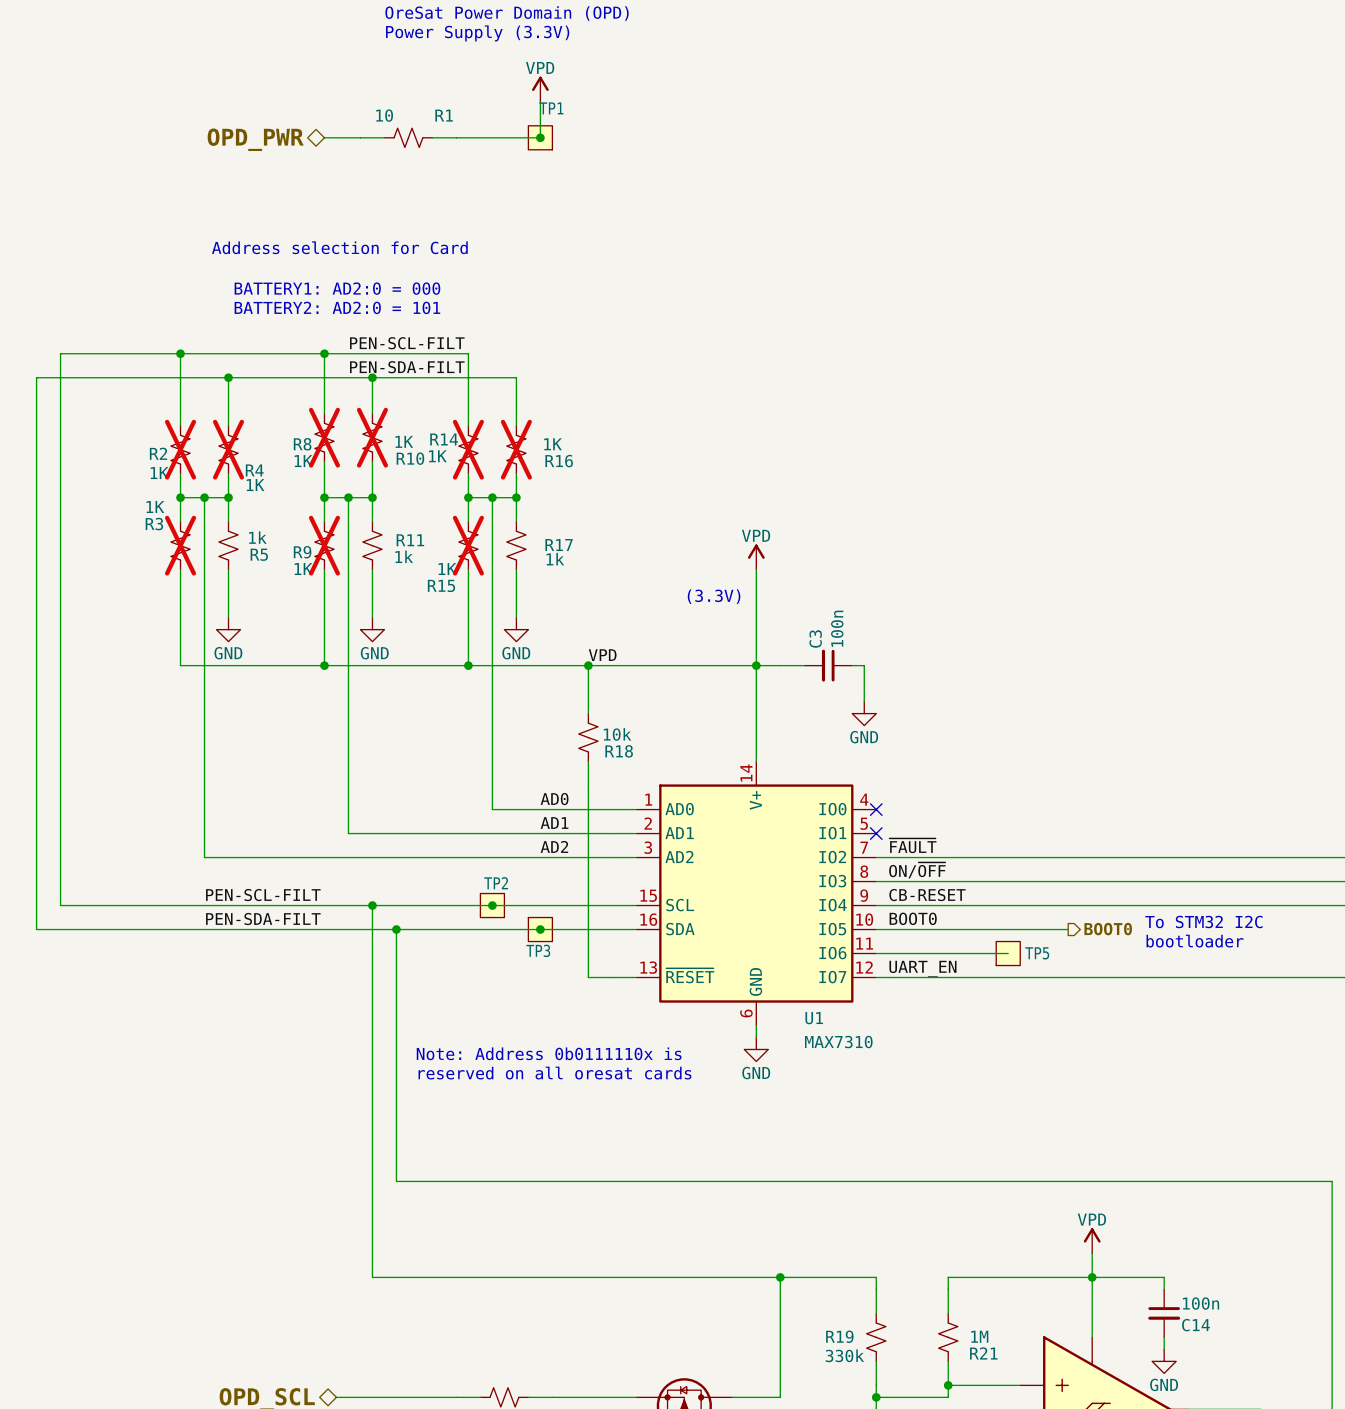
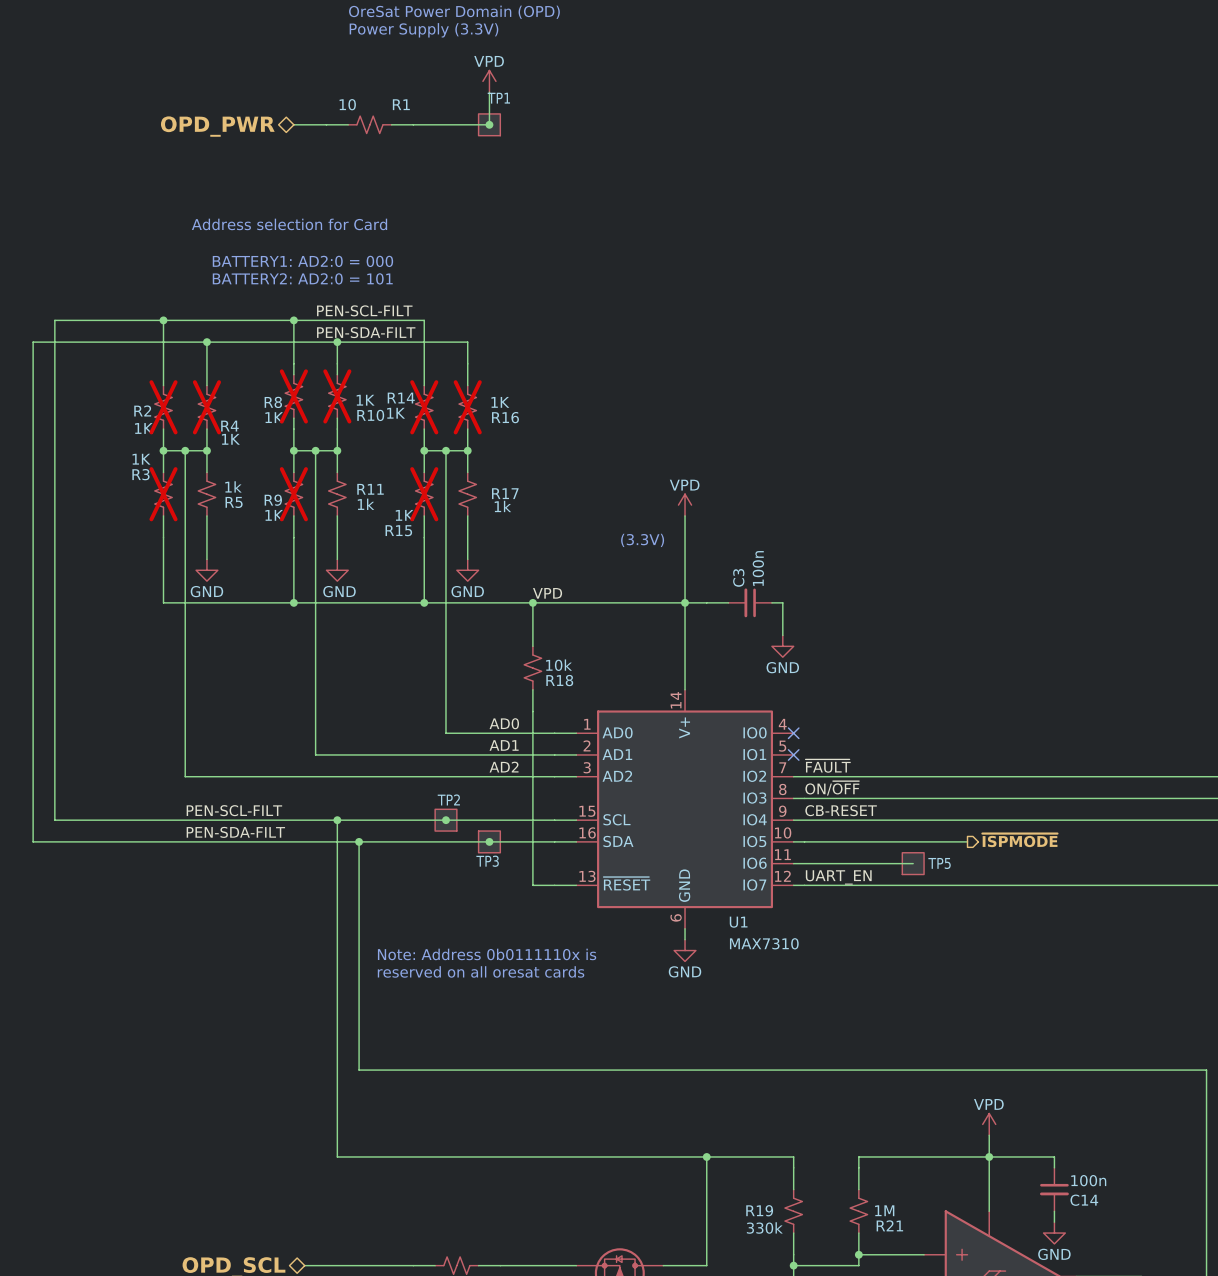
power symbol shape: [532, 76, 549, 102] -> [482, 70, 496, 93]
power symbol shape: [747, 544, 765, 570] -> [678, 494, 692, 516]
label: BOOT0 (913, 918) -> none
text: To STM32 I2C (1203, 921) -> none
hierarchical label: BOOT0 (1108, 929) -> ~{ISPMODE} (1019, 840)
text: bootloader (1194, 941) -> none
power symbol shape: [1083, 1228, 1101, 1254] -> [982, 1113, 996, 1136]

